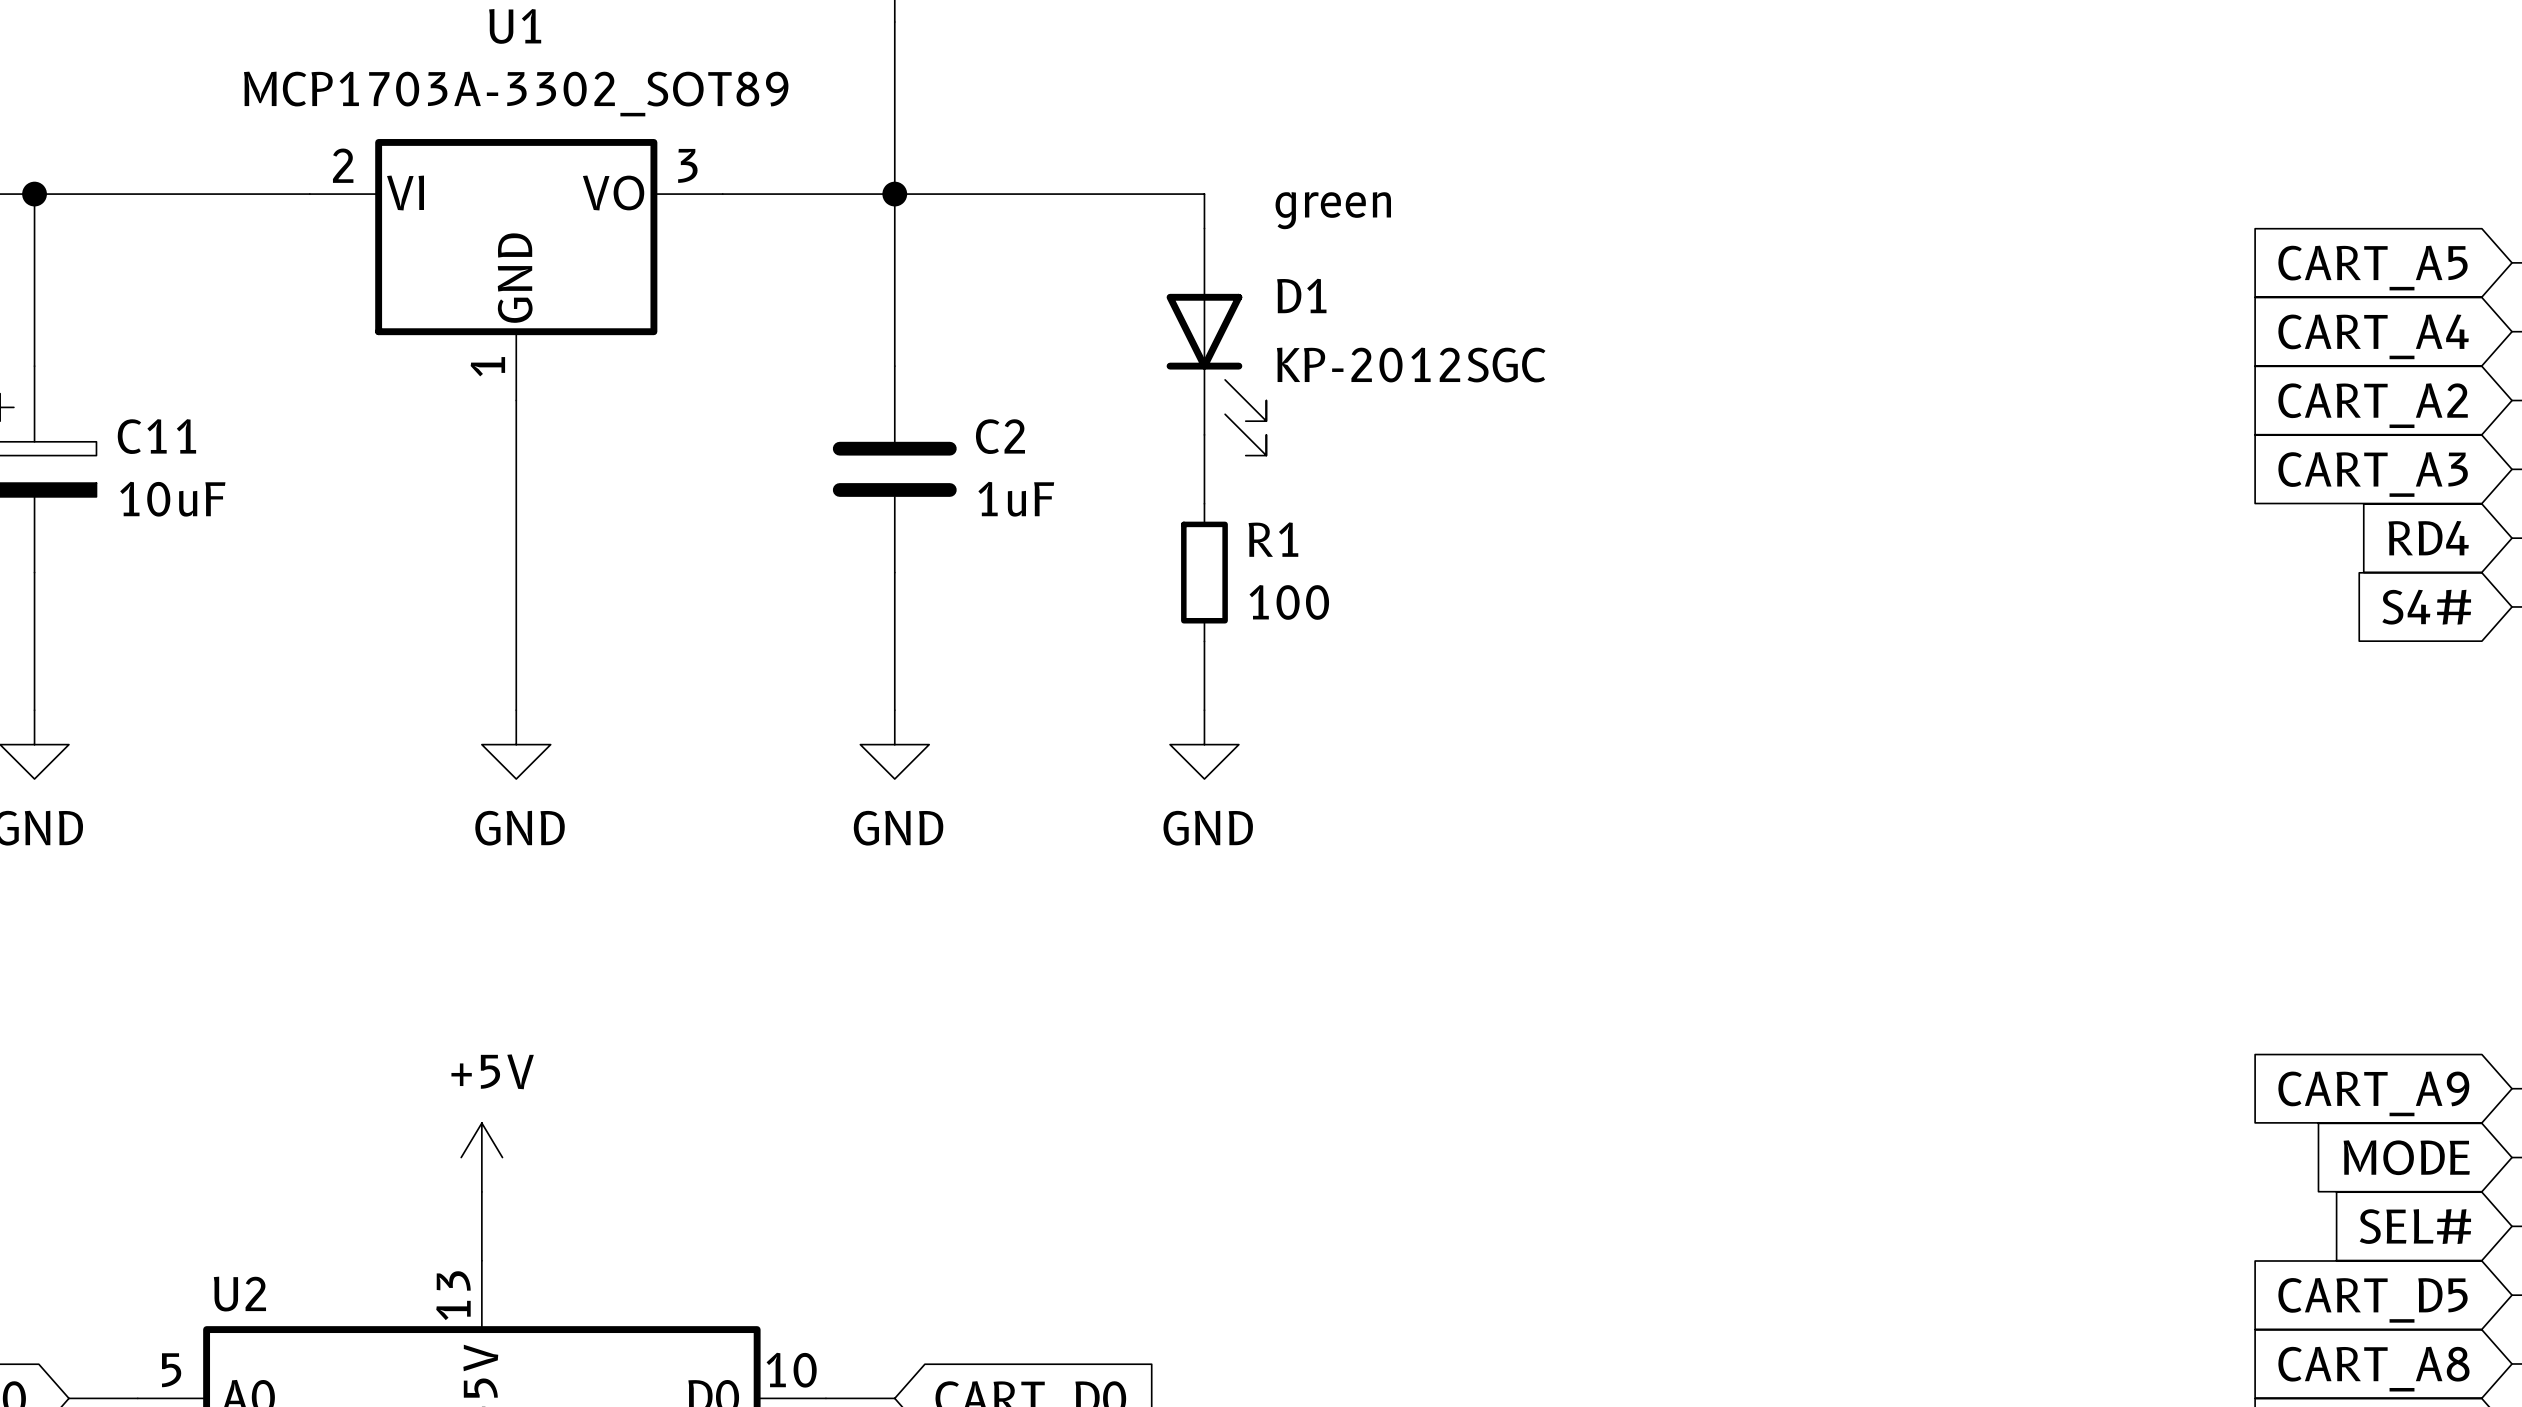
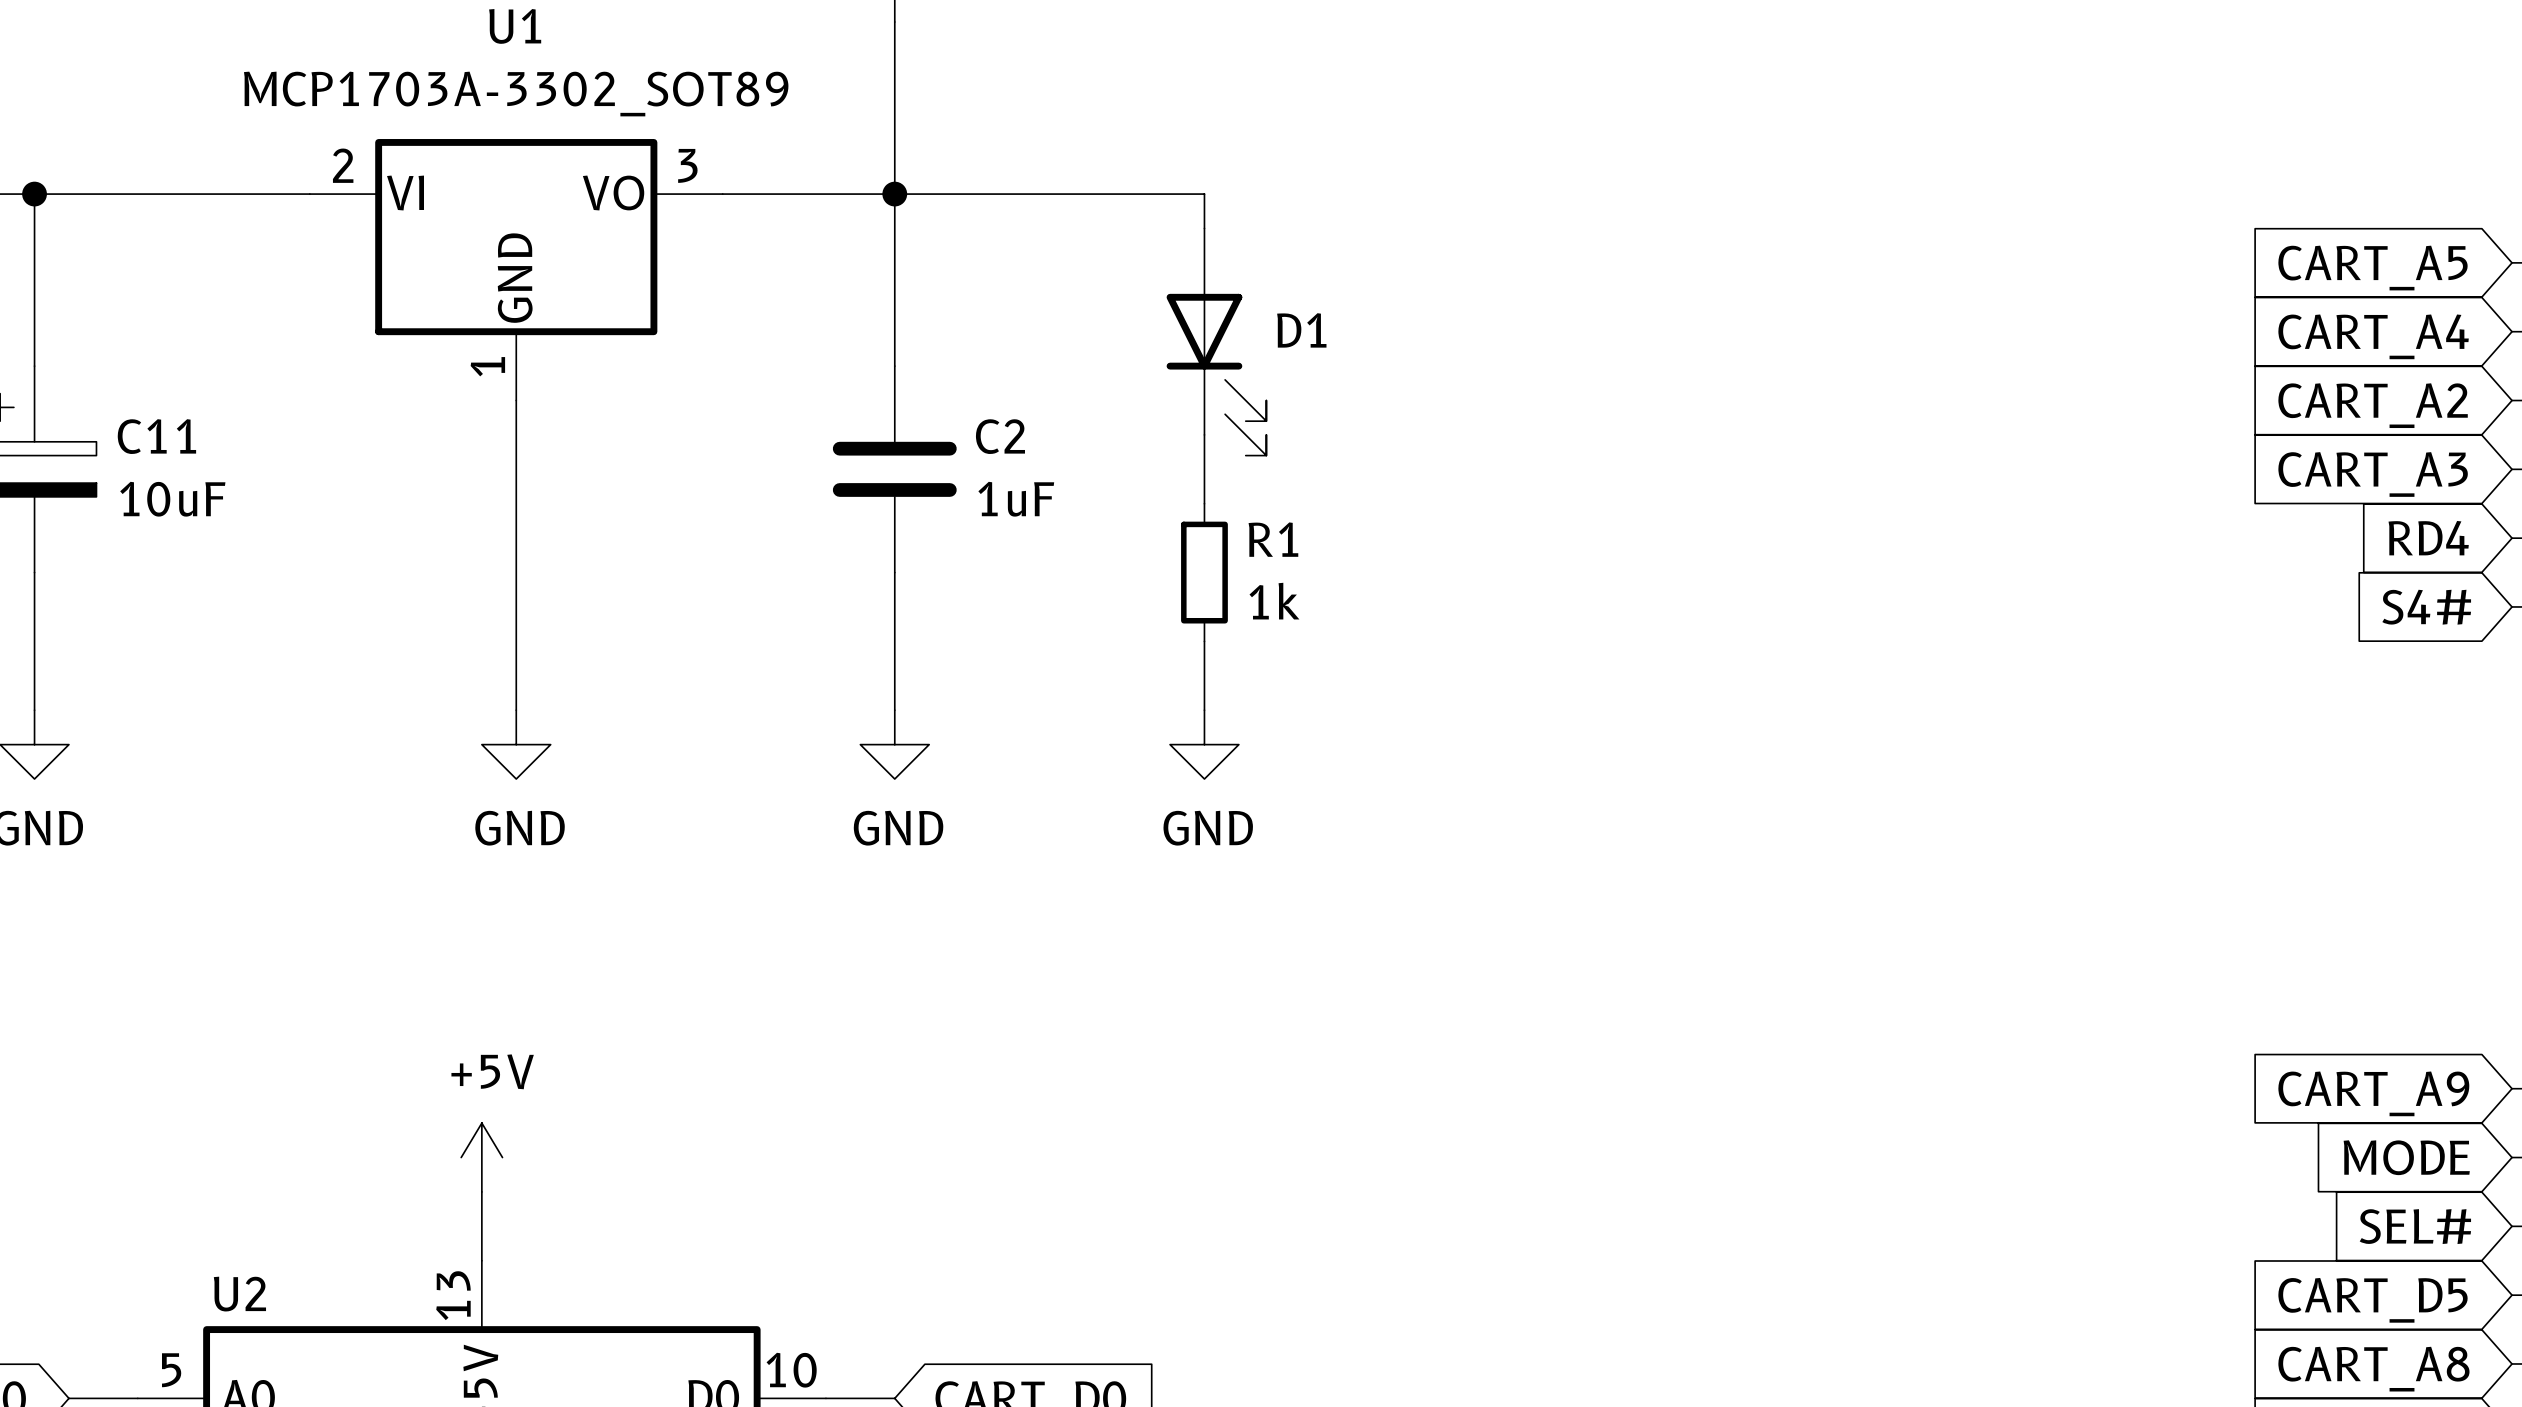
text: green (1333, 210) -> none
D1 name position: D1 (1301, 296) -> D1 (1301, 330)
D1 value: KP-2012SGC (1411, 365) -> none
R1 value: 100 (1289, 602) -> 1k (1274, 601)

